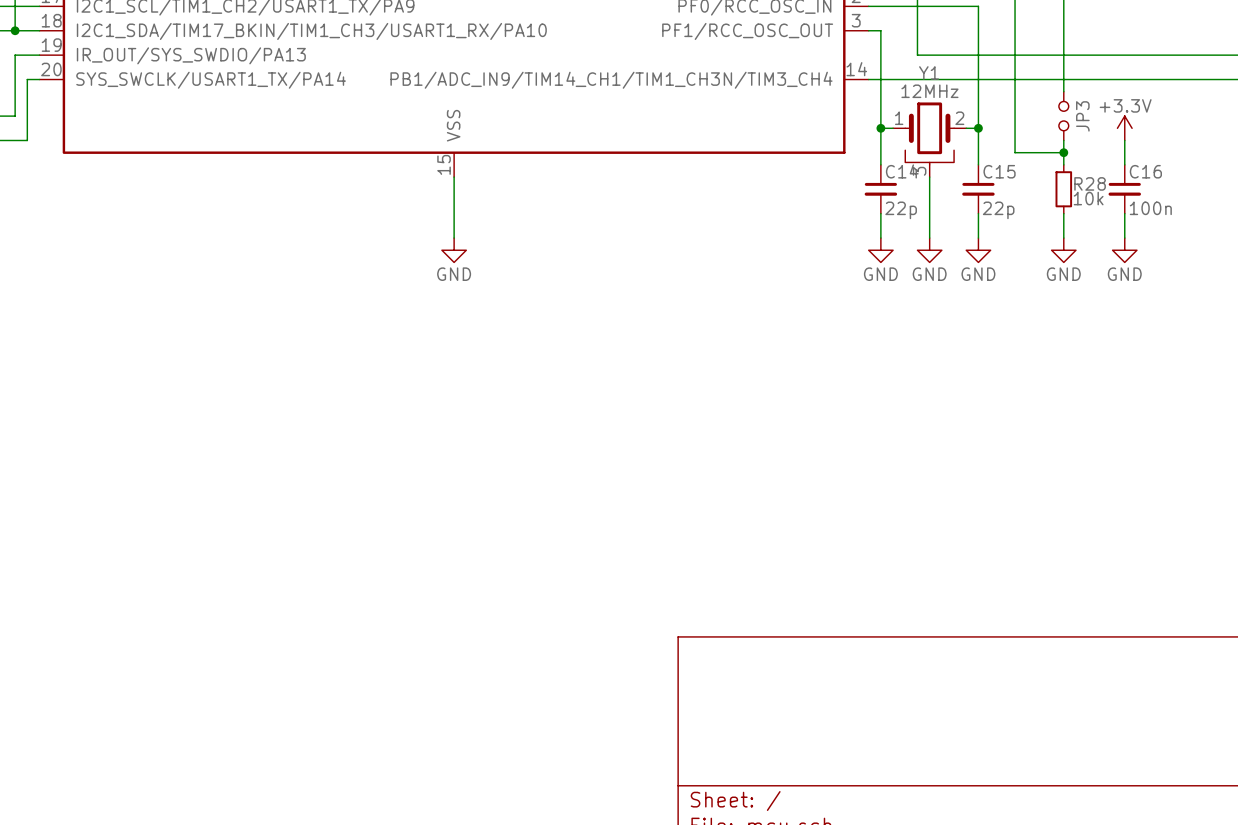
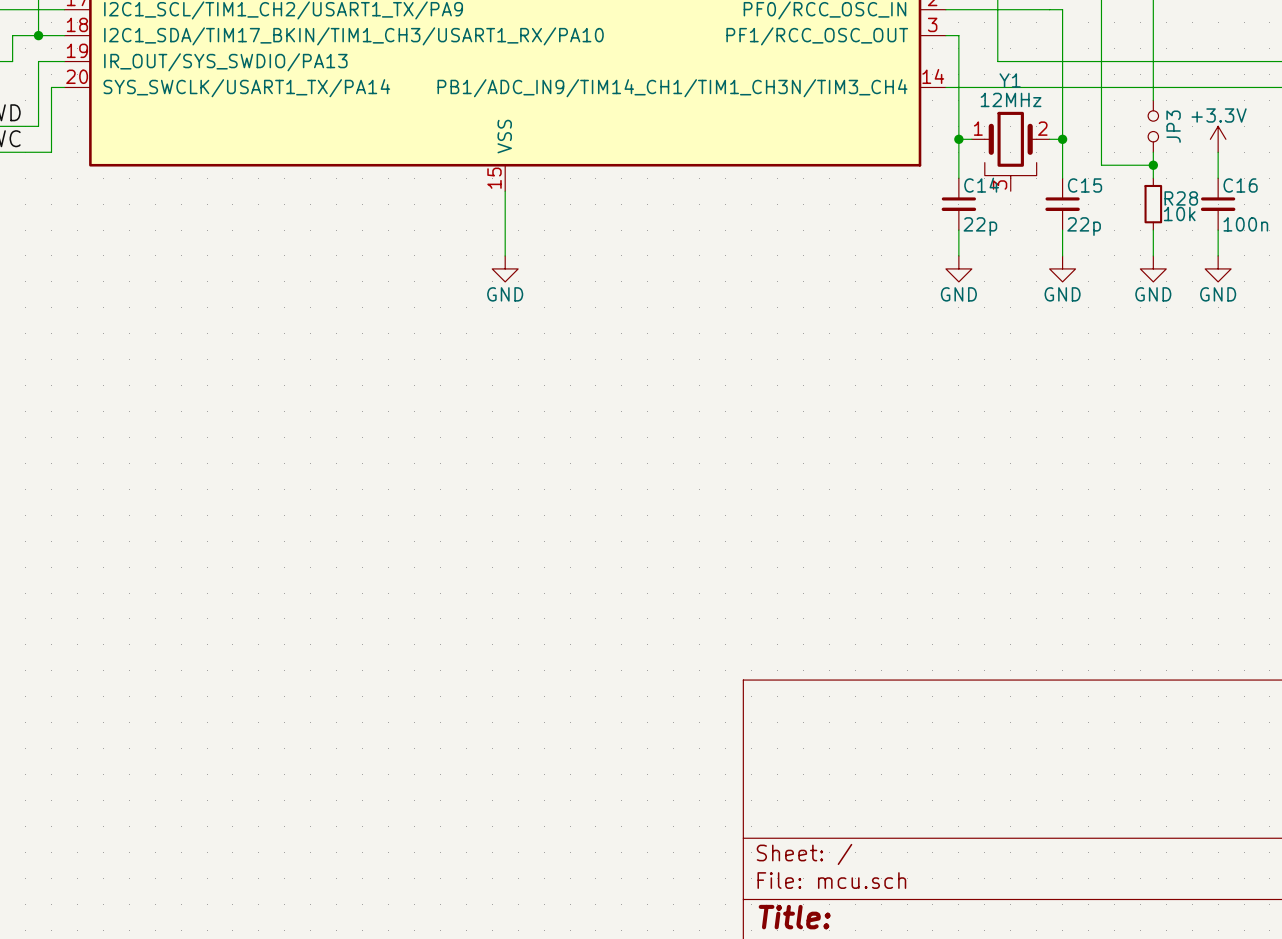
wire: (929, 177) (929, 238) -> none
power symbol: GND (929, 250) -> none

